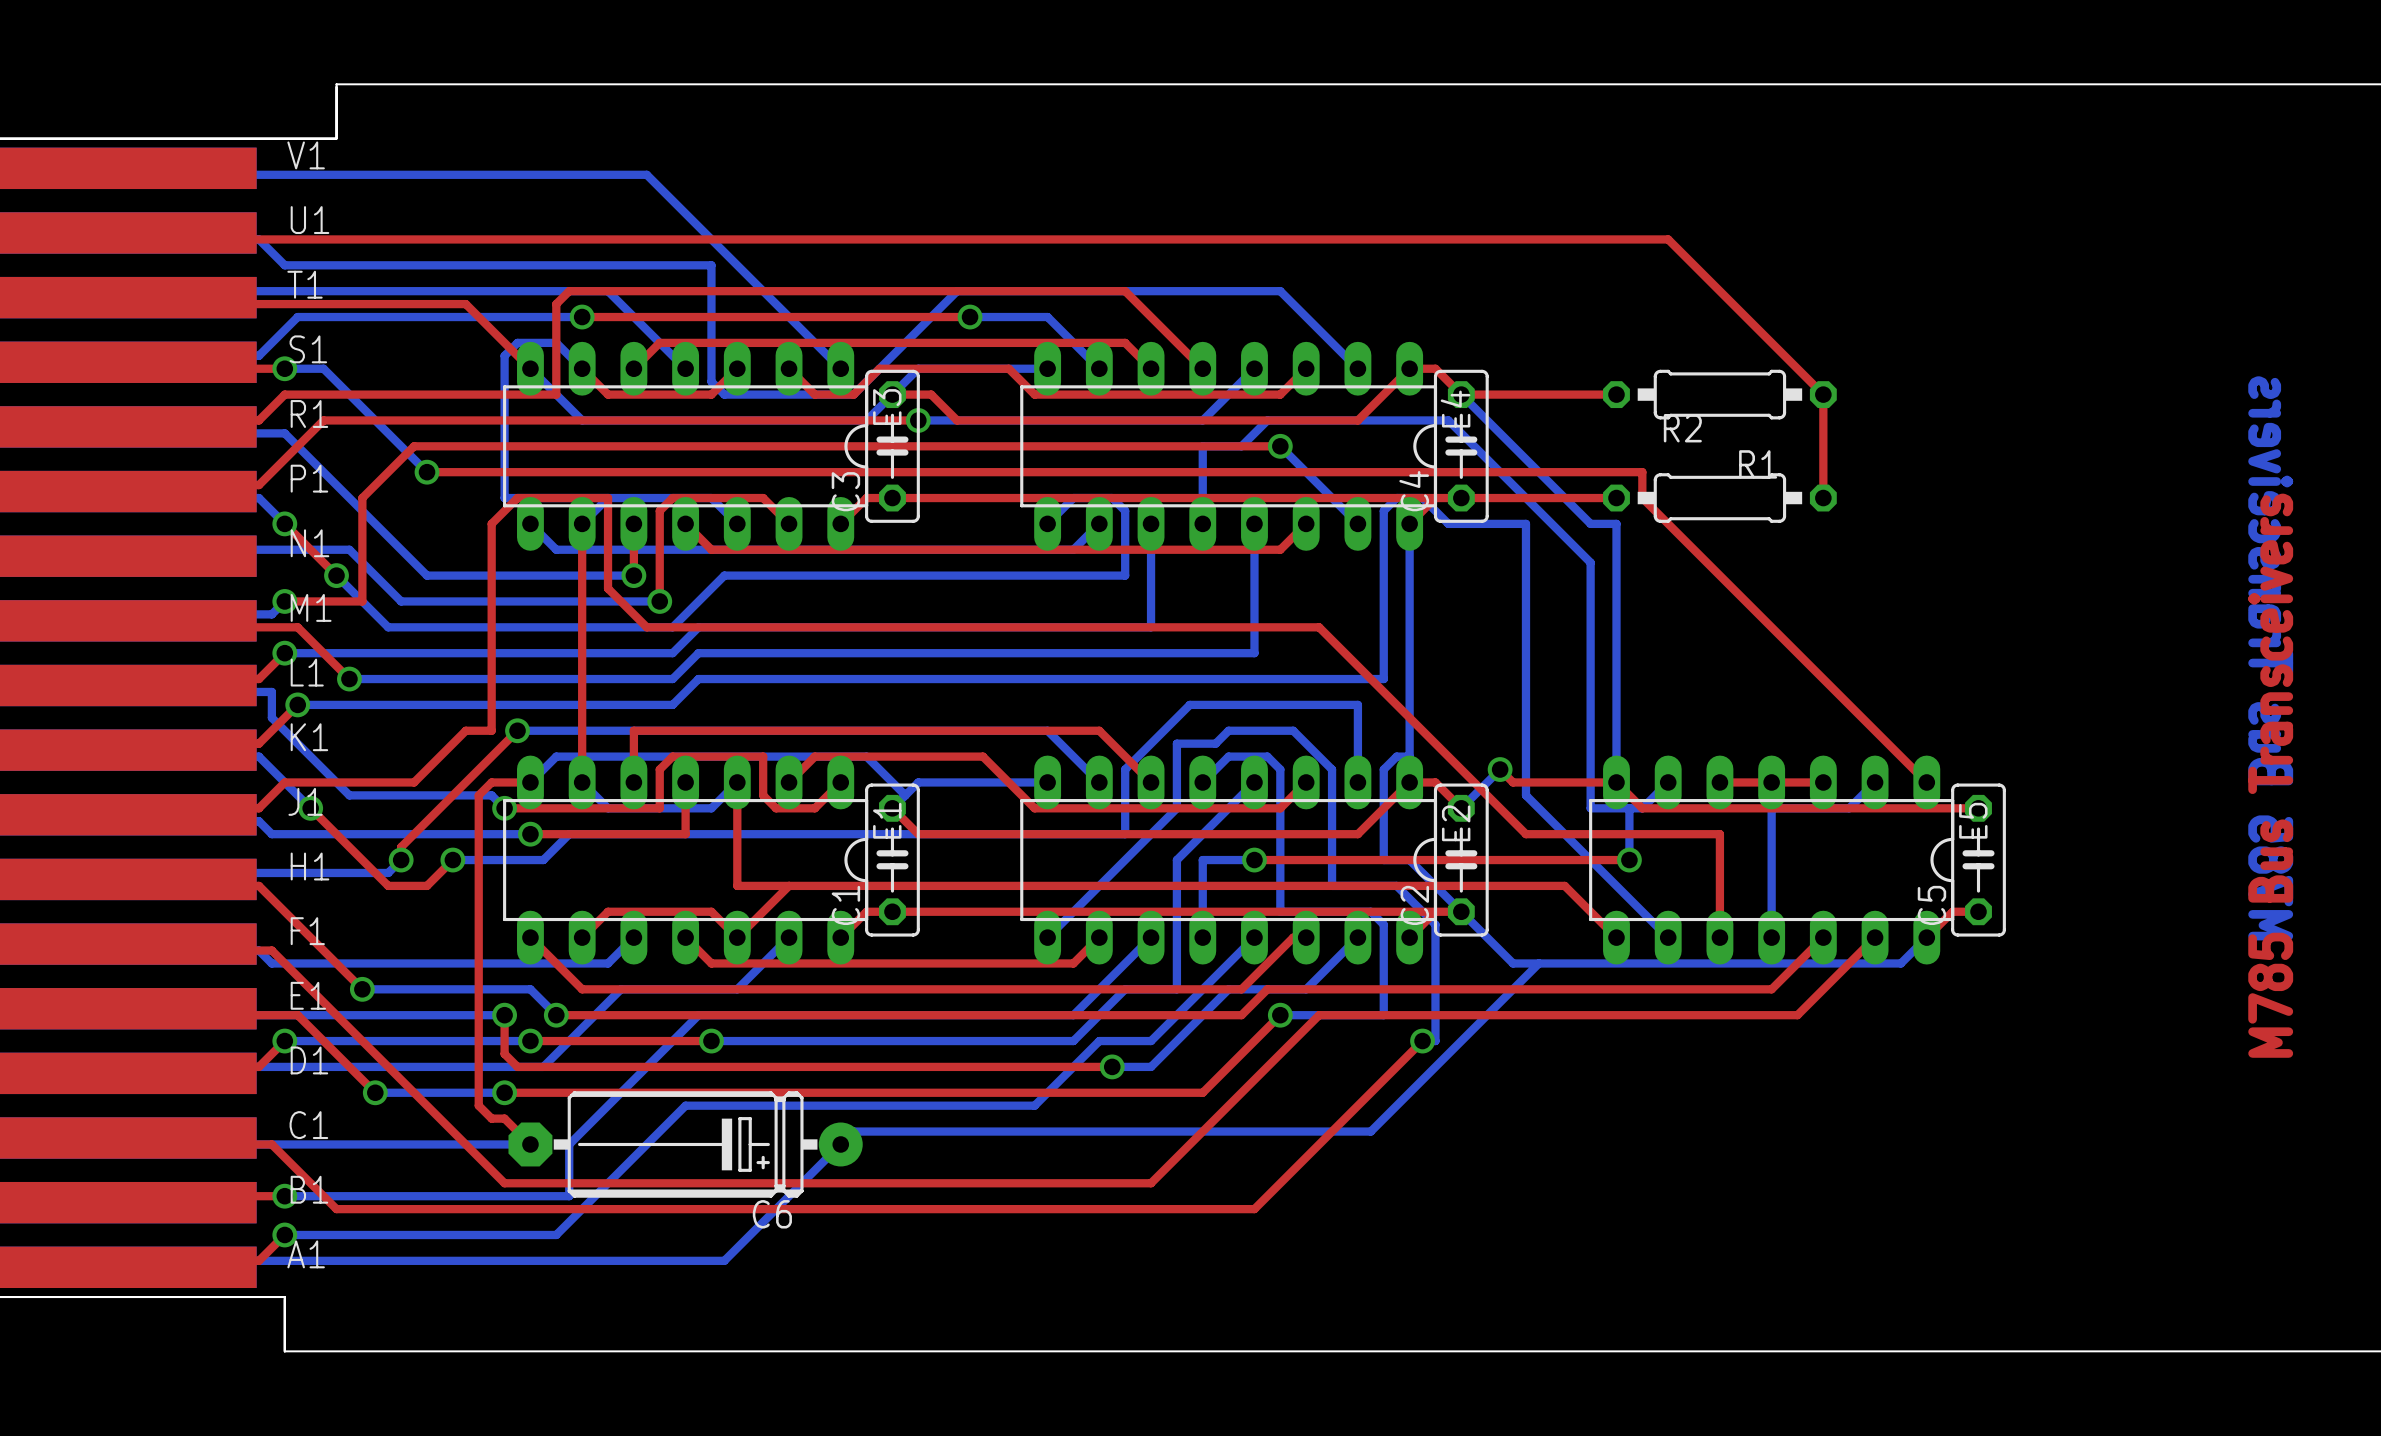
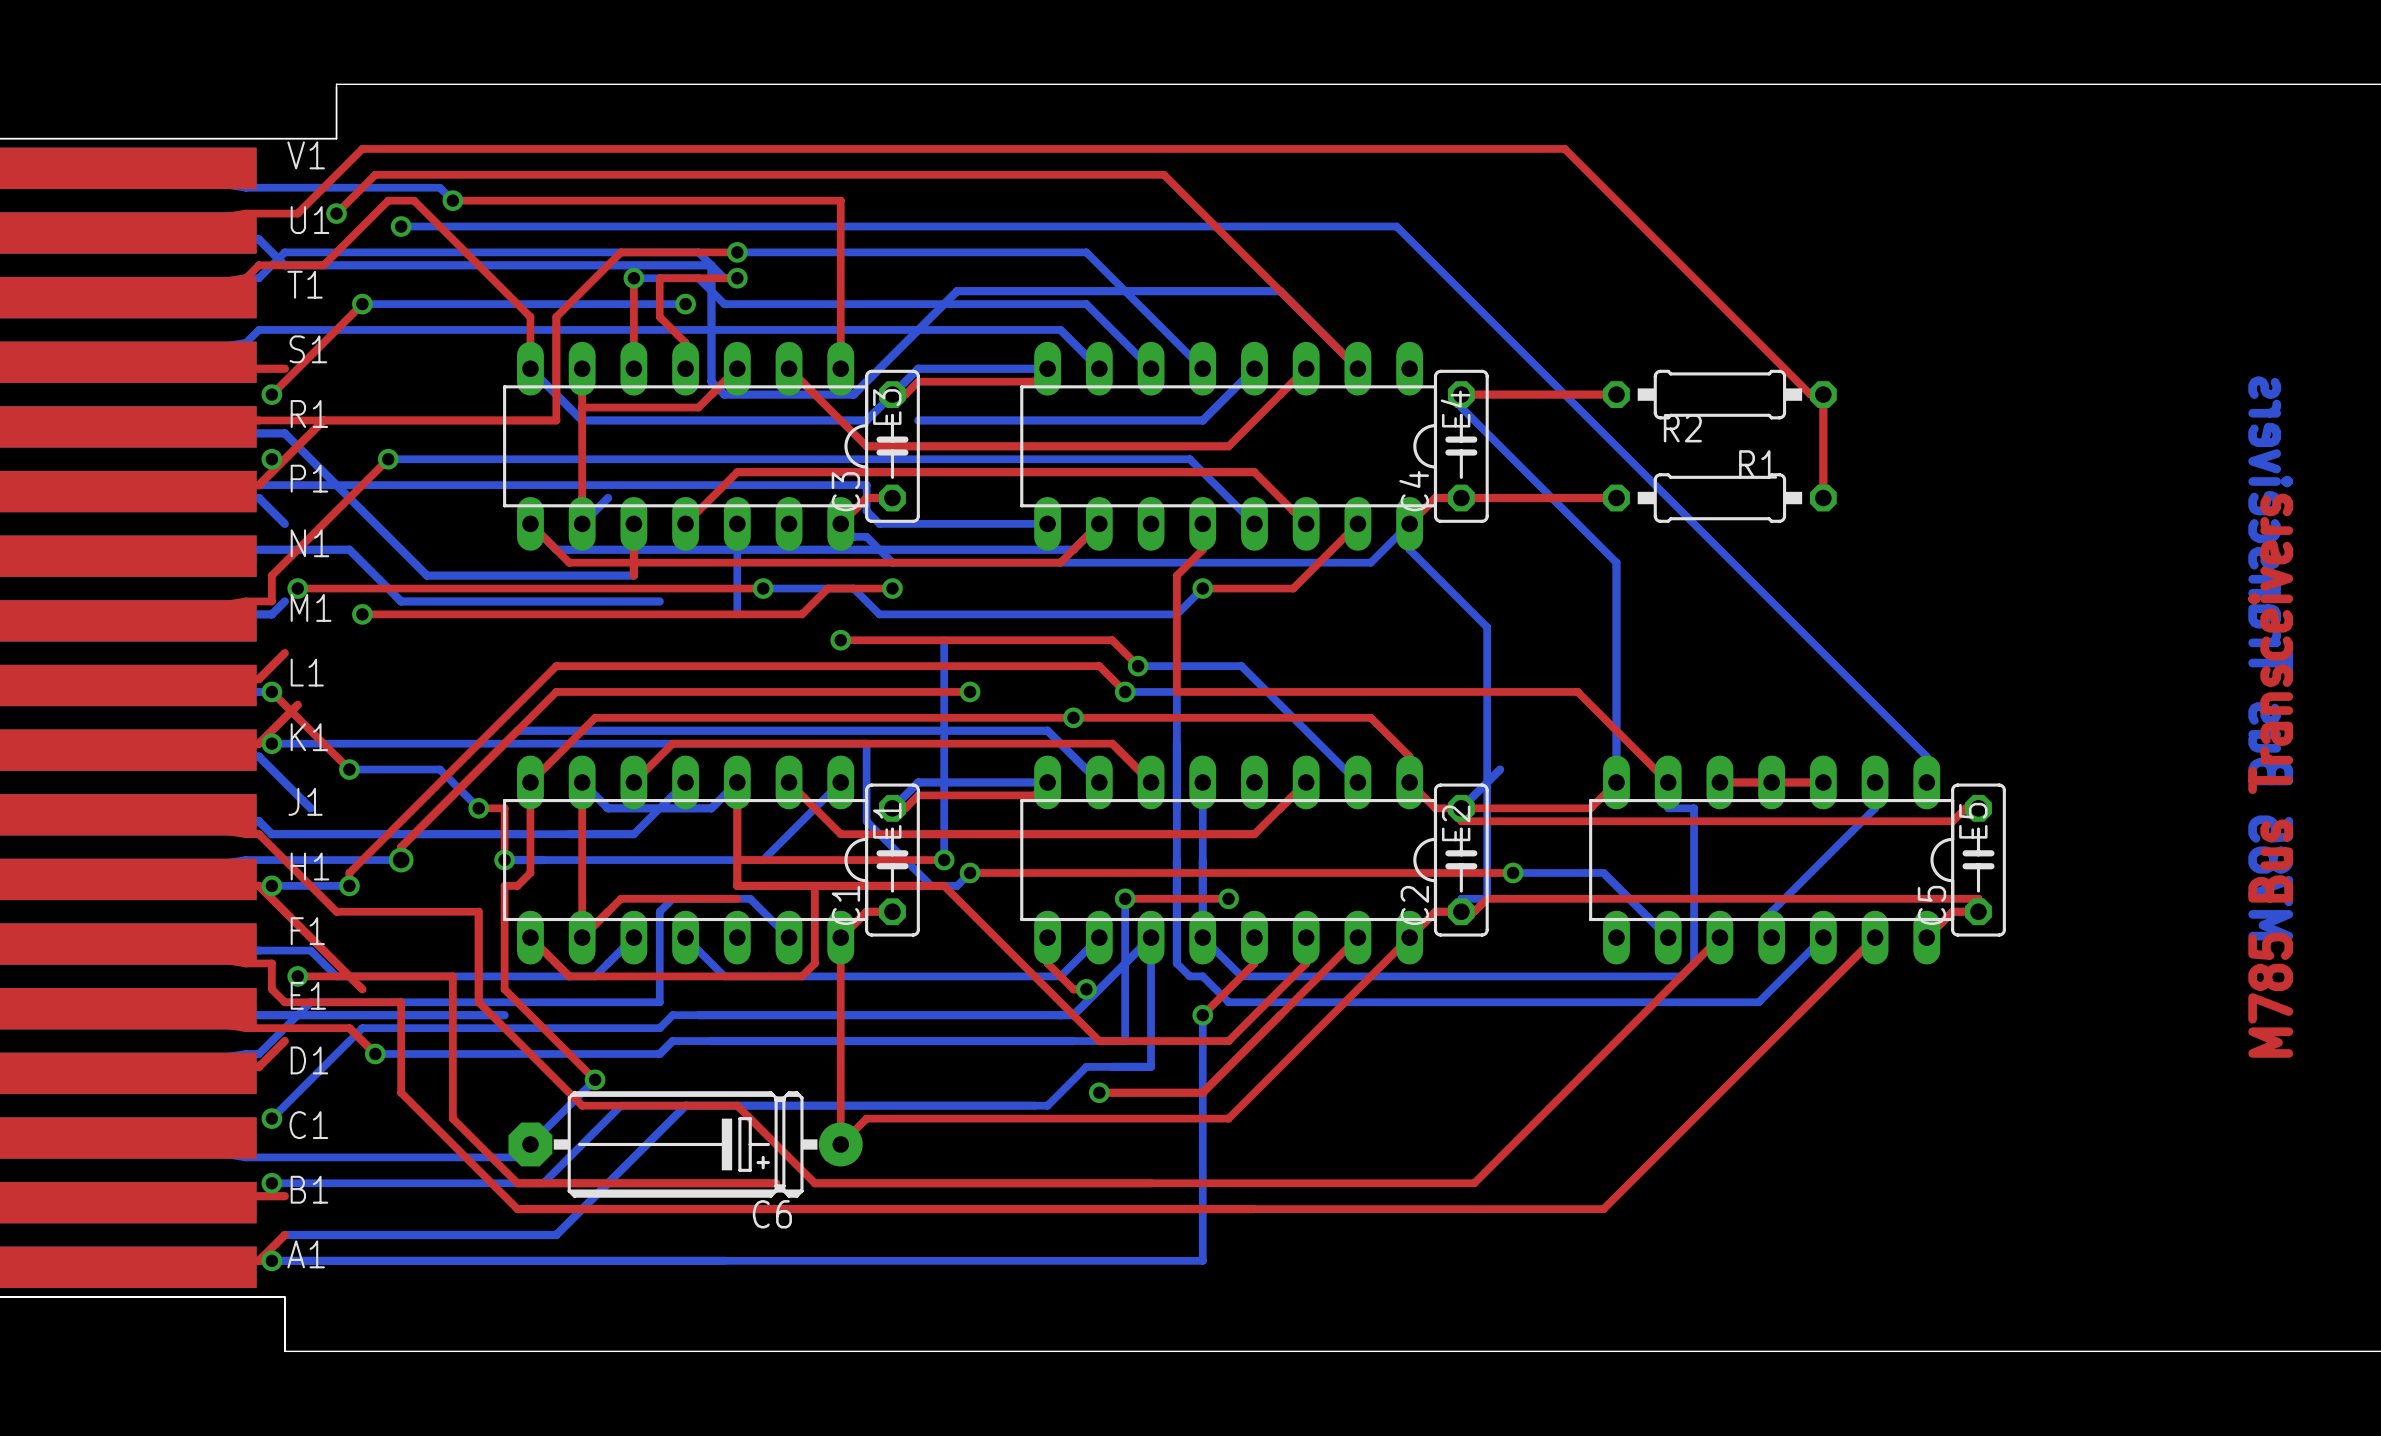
bottom track: (123, 168) (129, 174) (646, 174) (840, 368) -> (123, 168) (246, 187) (439, 187) (452, 200)
top track: none -> (452, 200) (840, 200) (840, 368)
via: none -> (452, 200)
top track: none -> (336, 213) (375, 174) (1163, 174) (1357, 368)
via: none -> (336, 213)
bottom track: none -> (401, 226) (1396, 226) (1926, 756) (1926, 782)
via: none -> (401, 226)
top track: (123, 232) (129, 239) (1668, 239) (1823, 394) -> (123, 232) (246, 213) (297, 213) (362, 148) (1564, 148) (1810, 394) (1823, 394)
bottom track: none -> (737, 252) (1086, 252) (1202, 368)
via: none -> (737, 252)
bottom track: none -> (633, 278) (698, 278) (724, 304) (1086, 304) (1151, 368)
via: none -> (633, 278)
top track: none -> (737, 278) (659, 278) (659, 317) (685, 342) (685, 368)
via: none -> (737, 278)
bottom track: (123, 297) (129, 291) (608, 291) (685, 368) -> (123, 297) (246, 278) (258, 278) (284, 252) (698, 252) (724, 278) (737, 278)
top track: (123, 297) (129, 304) (465, 304) (530, 368) -> (123, 297) (246, 278) (258, 265) (323, 265) (388, 200) (414, 200) (530, 317) (530, 368)
bottom track: none -> (362, 304) (685, 304)
top track: none -> (362, 304) (271, 394)
via: none -> (362, 304)
via: none -> (685, 304)
top track: (556, 317) (556, 304) (569, 291) (1125, 291) (1202, 368) -> (556, 317) (620, 252) (737, 252)
bottom track: (582, 317) (297, 317) (258, 355) (129, 355) (123, 362) -> (1060, 329) (258, 329) (246, 342) (123, 362)
top track: (582, 317) (970, 317) -> none
via: (582, 317) -> none
bottom track: (970, 317) (1047, 317) (1060, 329) -> none
via: (970, 317) -> none
bottom track: (284, 368) (323, 368) (427, 472) -> none
via: (284, 368) -> none
bottom track: (582, 368) (556, 342) (517, 342) (504, 355) (504, 498) (711, 498) (737, 523) -> (737, 614) (737, 523)
top track: (582, 368) (608, 394) (711, 394) -> (582, 407) (698, 407) (711, 394)
top track: (633, 368) (659, 342) (1125, 342) (1151, 368) -> (633, 368) (633, 278)
via: none -> (271, 394)
top track: (556, 394) (284, 394) (258, 420) -> (323, 420) (258, 420)
top track: (814, 394) (853, 394) (879, 368) (1008, 368) (1034, 394) (1280, 394) -> (814, 394) (866, 446)
top track: (905, 394) (931, 394) (957, 420) (1357, 420) (1409, 368) (1435, 368) (1461, 394) -> (905, 394) (918, 381) (1034, 381) (1047, 368)
bottom track: (1461, 394) (1590, 523) (1616, 523) (1616, 562) -> (1461, 394) (1461, 407) (1616, 562)
top track: (556, 420) (918, 420) -> (556, 420) (556, 394)
via: (918, 420) -> none
top track: (866, 446) (414, 446) (362, 498) (362, 601) (284, 601) -> none
top track: (1228, 446) (1280, 446) -> (1228, 446) (1280, 394)
bottom track: (1280, 446) (1357, 523) -> none
via: (1280, 446) -> none
via: none -> (271, 459)
via: none -> (388, 459)
top track: (427, 472) (737, 472) -> (685, 523) (737, 472)
via: (427, 472) -> none
top track: (1254, 472) (1642, 472) (1642, 498) (1926, 782) -> none
top track: (892, 498) (1435, 498) -> none
top track: (284, 523) (336, 575) -> none
via: (284, 523) -> none
top track: none -> (530, 523) (569, 562) (1060, 562) (1099, 523)
top track: (582, 523) (582, 782) -> (582, 523) (582, 368)
top track: (685, 523) (711, 549) (1280, 549) (1306, 523) -> (1254, 472) (1306, 523)
top track: (789, 523) (763, 498) (672, 498) (659, 510) (659, 601) -> none
bottom track: none -> (840, 523) (853, 536) (866, 536) (892, 562) (1370, 562) (1409, 523)
bottom track: (1047, 523) (1073, 498) (1112, 498) (1125, 510) (1125, 575) (724, 575) (672, 627) (388, 627) (336, 575) -> (1047, 523) (879, 523) (866, 510) (866, 485) (246, 485) (123, 491)
bottom track: (1151, 523) (1151, 627) (698, 627) (672, 653) (284, 653) -> none
bottom track: (1202, 523) (1202, 446) (1241, 446) (1267, 420) (1448, 420) (1590, 562) (1590, 808) (1642, 808) (1668, 782) -> (1202, 937) (1241, 976) (1681, 976) (1694, 963) (1694, 808) (1668, 808) (1668, 782)
top track: none -> (1202, 523) (1202, 549) (1176, 575) (1176, 691) (1577, 691) (1668, 782)
bottom track: (1254, 523) (1254, 653) (698, 653) (672, 679) (349, 679) -> (1254, 523) (1189, 459) (388, 459)
top track: none -> (1357, 523) (1293, 588) (1202, 588)
bottom track: (1409, 549) (1409, 756) (1396, 756) (1383, 769) (1383, 860) (1409, 860) (1513, 963) (1900, 963) (1926, 937) -> (1409, 549) (1487, 627) (1487, 898) (1461, 898) (1461, 911)
via: (336, 575) -> none
via: (633, 575) -> none
top track: none -> (297, 588) (763, 588)
bottom track: none -> (763, 588) (853, 588) (879, 614) (1176, 614) (1202, 588)
via: none -> (763, 588)
top track: none -> (892, 588) (827, 588) (801, 614) (362, 614)
via: none -> (892, 588)
via: none -> (1202, 588)
via position: (284, 601) -> (297, 588)
via: (659, 601) -> none
via: none -> (362, 614)
top track: (123, 620) (129, 627) (297, 627) (349, 679) -> (123, 620) (246, 601) (271, 601) (271, 575) (388, 459)
top track: none -> (840, 640) (1112, 640) (1138, 666)
via: none -> (840, 640)
bottom track: none -> (944, 640) (944, 860)
via: (284, 653) -> none
via: none -> (1138, 666)
via: (349, 679) -> none
bottom track: (271, 691) (271, 717) (349, 795) (491, 795) (504, 808) -> none
top track: none -> (271, 691) (349, 769)
via: none -> (271, 691)
top track: none -> (970, 691) (556, 691) (517, 730)
via: none -> (970, 691)
top track: none -> (1125, 691) (1099, 666) (556, 666) (349, 872) (349, 885)
via: none -> (1125, 691)
bottom track: (297, 704) (672, 704) (698, 679) (1383, 679) (1383, 510) (1396, 498) (1422, 498) (1448, 523) (1525, 523) (1525, 795) (1603, 872) -> (1513, 872) (1603, 872)
via: (297, 704) -> none
via: none -> (1073, 717)
via: (517, 730) -> none
bottom track: none -> (271, 743) (866, 743) (866, 821) (931, 885) (957, 885) (970, 872)
via: none -> (271, 743)
top track: (1112, 743) (1099, 730) (633, 730) (633, 782) -> (1112, 743) (672, 743) (633, 782)
bottom track: (1176, 743) (1215, 743) (1228, 730) (1293, 730) (1332, 769) (1332, 885) (1396, 885) (1435, 924) (1435, 1041) (1422, 1041) -> (1176, 743) (1176, 691) (1125, 691)
bottom track: none -> (349, 769) (439, 769) (478, 808)
via: none -> (349, 769)
top track: (1500, 769) (1513, 782) (1616, 782) (1642, 808) (1965, 808) -> (1461, 808) (1461, 821) (1952, 821) (1965, 808)
via: (1500, 769) -> none
bottom track: (530, 782) (556, 756) (866, 756) (905, 795) -> none
top track: (530, 782) (491, 782) (478, 795) (478, 911) -> (123, 814) (246, 834) (258, 834) (336, 911) (478, 911)
top track: none -> (582, 782) (582, 937)
bottom track: none -> (685, 782) (633, 834)
top track: (685, 782) (685, 834) (530, 834) -> none
top track: (789, 782) (814, 756) (982, 756) (1034, 808) (1280, 808) -> none
bottom track: none -> (840, 782) (763, 860) (543, 860)
top track: (840, 782) (814, 808) (776, 808) (763, 795) (763, 756) (672, 756) (659, 769) (659, 808) (504, 808) -> none
top track: none -> (1047, 782) (1034, 795) (918, 795) (905, 808) (892, 808)
bottom track: (1202, 782) (1228, 756) (1267, 756) (1280, 769) (1280, 911) (1370, 911) (1383, 924) (1383, 1015) (1280, 1015) -> none
bottom track: (1254, 782) (1176, 860) -> (1176, 808) (1176, 860)
bottom track: (1357, 782) (1357, 704) (1189, 704) (1125, 769) (1125, 834) (633, 834) -> (1357, 782) (1241, 666) (1138, 666)
top track: none -> (1616, 782) (1590, 808) (1435, 808) (1409, 782) (1409, 756) (1370, 717) (595, 717) (530, 782) (530, 872) (517, 885) (504, 885) (504, 989) (595, 1079)
bottom track: (1875, 782) (1849, 808) (1771, 808) (1771, 911) -> (1875, 782) (1875, 808) (1771, 911)
top track: (310, 808) (388, 885) (427, 885) (452, 860) -> none
via: (310, 808) -> none
top track: none -> (478, 808) (504, 808) (504, 860)
via: none -> (478, 808)
via: (504, 808) -> none
top track: (892, 808) (918, 834) -> (789, 782) (840, 834) (918, 834)
bottom track: (1176, 808) (1047, 937) -> none
top track: (1461, 808) (1435, 782) (1409, 782) (1357, 834) (1254, 834) -> (1280, 808) (1254, 834)
bottom track: (1629, 808) (1629, 860) -> none
top track: (123, 814) (129, 808) (258, 808) (284, 782) (414, 782) (465, 730) (491, 730) (491, 523) (517, 498) (608, 498) (608, 588) (646, 627) (1319, 627) (1525, 834) (1719, 834) (1719, 937) -> (1151, 1183) (1474, 1183) (1719, 937)
via: (530, 834) -> none
bottom track: (569, 834) (543, 860) -> (569, 834) (530, 834)
bottom track: (401, 860) (388, 872) (129, 872) (123, 879) -> (401, 860) (246, 860) (123, 879)
bottom track: (452, 860) (504, 860) -> none
via: (452, 860) -> none
via: none -> (504, 860)
top track: none -> (737, 860) (944, 860)
via: none -> (944, 860)
bottom track: (1202, 860) (1254, 860) -> (1202, 860) (1202, 782)
top track: (1254, 860) (1629, 860) -> none
via: (1254, 860) -> none
via: (1629, 860) -> none
via: none -> (970, 872)
via: none -> (1513, 872)
bottom track: none -> (271, 885) (349, 885)
via: none -> (271, 885)
via: none -> (349, 885)
top track: (789, 885) (737, 937) (711, 911) (608, 911) -> (737, 898) (620, 898) (608, 911)
top track: (944, 885) (1564, 885) (1616, 937) -> none
top track: none -> (1125, 898) (1228, 898)
via: none -> (1125, 898)
via: none -> (1228, 898)
top track: (892, 911) (1435, 911) -> (970, 872) (1513, 872)
top track: none -> (1461, 911) (1474, 911) (1487, 898) (1978, 898) (1978, 911)
bottom track: none -> (685, 937) (724, 976) (1060, 976) (1099, 937)
top track: (685, 937) (711, 963) (1073, 963) (1099, 937) -> none
bottom track: (789, 937) (737, 989) (620, 989) (543, 1066) (129, 1066) (123, 1073) -> (789, 937) (750, 898) (672, 898) (659, 911) (659, 1002) (310, 1002) (258, 1053) (246, 1053) (123, 1073)
top track: none -> (840, 937) (840, 1144) (866, 1118) (1228, 1118) (1409, 937)
top track: none -> (1047, 937) (1047, 963) (1073, 989)
bottom track: (1254, 937) (1151, 1041) (1125, 1041) -> (1125, 898) (1125, 1041)
top track: none -> (1254, 937) (1254, 963) (1202, 1015)
top track: (1306, 937) (1293, 937) (1241, 989) (1086, 989) -> (1306, 937) (1306, 963) (1228, 1041) (1099, 1041) (944, 885)
bottom track: (1357, 937) (1306, 989) (1228, 989) (1151, 1066) -> (1151, 937) (1151, 1066)
top track: none -> (1357, 937) (1280, 1015)
bottom track: none -> (1823, 937) (1758, 1002) (1228, 1002) (1202, 976) (1189, 976) (1176, 963)
top track: (1823, 937) (1771, 989) (1267, 989) (1241, 1015) (556, 1015) -> none
top track: (123, 944) (129, 950) (271, 950) (349, 1028) -> (123, 1008) (246, 1028) (349, 1028)
bottom track: (258, 950) (271, 963) (608, 963) -> (258, 950) (310, 950) (336, 976) (595, 976) (608, 963)
bottom track: (1176, 963) (1176, 989) (1125, 989) (1073, 1041) -> (1099, 1041) (1073, 1041)
bottom track: (1538, 963) (1370, 1131) (853, 1131) (840, 1144) -> none
via: none -> (297, 976)
top track: (569, 976) (582, 989) (1073, 989) -> (569, 976) (801, 976) (814, 963) (814, 885)
bottom track: (362, 989) (530, 989) (556, 1015) -> none
via: (362, 989) -> none
via: none -> (1086, 989)
top track: (478, 1002) (478, 1105) (491, 1118) (504, 1118) (530, 1144) -> (478, 1002) (582, 1105) (737, 1105) (814, 1183)
top track: (123, 1008) (129, 1015) (297, 1015) (375, 1092) -> none
top track: (504, 1015) (504, 1053) (517, 1066) (1112, 1066) -> none
via: (504, 1015) -> none
via: (556, 1015) -> none
bottom track: (698, 1015) (672, 1041) -> (711, 1041) (672, 1041)
bottom track: none -> (698, 1015) (672, 1015) (659, 1028) (362, 1028) (271, 1118)
via: none -> (1202, 1015)
via: (1280, 1015) -> none
top track: (1797, 1015) (1319, 1015) (1151, 1183) -> (1797, 1015) (1603, 1209) (1254, 1209)
bottom track: (284, 1041) (530, 1041) -> none
via: (284, 1041) -> none
top track: (530, 1041) (711, 1041) -> none
via: (530, 1041) -> none
via: (711, 1041) -> none
bottom track: (1099, 1041) (1034, 1105) -> (1112, 1066) (1086, 1066) (1047, 1105) (1034, 1105)
top track: (1422, 1041) (1254, 1209) -> none
via: (1422, 1041) -> none
top track: (375, 1053) (504, 1183) (517, 1183) -> (297, 976) (452, 976) (452, 1118) (517, 1183)
via: none -> (375, 1053)
bottom track: (659, 1053) (569, 1144) (569, 1196) (284, 1196) -> (659, 1053) (375, 1053)
via: (1112, 1066) -> none
via: none -> (595, 1079)
bottom track: (375, 1092) (504, 1092) -> none
via: (375, 1092) -> none
top track: (504, 1092) (1099, 1092) -> none
via: (504, 1092) -> none
via: none -> (1099, 1092)
bottom track: none -> (685, 1105) (620, 1105) (543, 1183) (271, 1183)
via: none -> (271, 1118)
bottom track: (123, 1138) (129, 1144) (530, 1144) -> (123, 1138) (246, 1157) (517, 1157) (595, 1079)
top track: (123, 1138) (129, 1144) (271, 1144) (336, 1209) (517, 1209) -> (123, 944) (246, 963) (271, 963) (271, 989) (284, 1002) (401, 1002) (401, 1092) (517, 1209)
bottom track: (827, 1157) (724, 1260) -> (1202, 1015) (1202, 1260) (724, 1260)
top track: (776, 1183) (814, 1183) -> none
via position: (284, 1196) -> (271, 1183)
via: (284, 1234) -> none
via: none -> (271, 1260)

